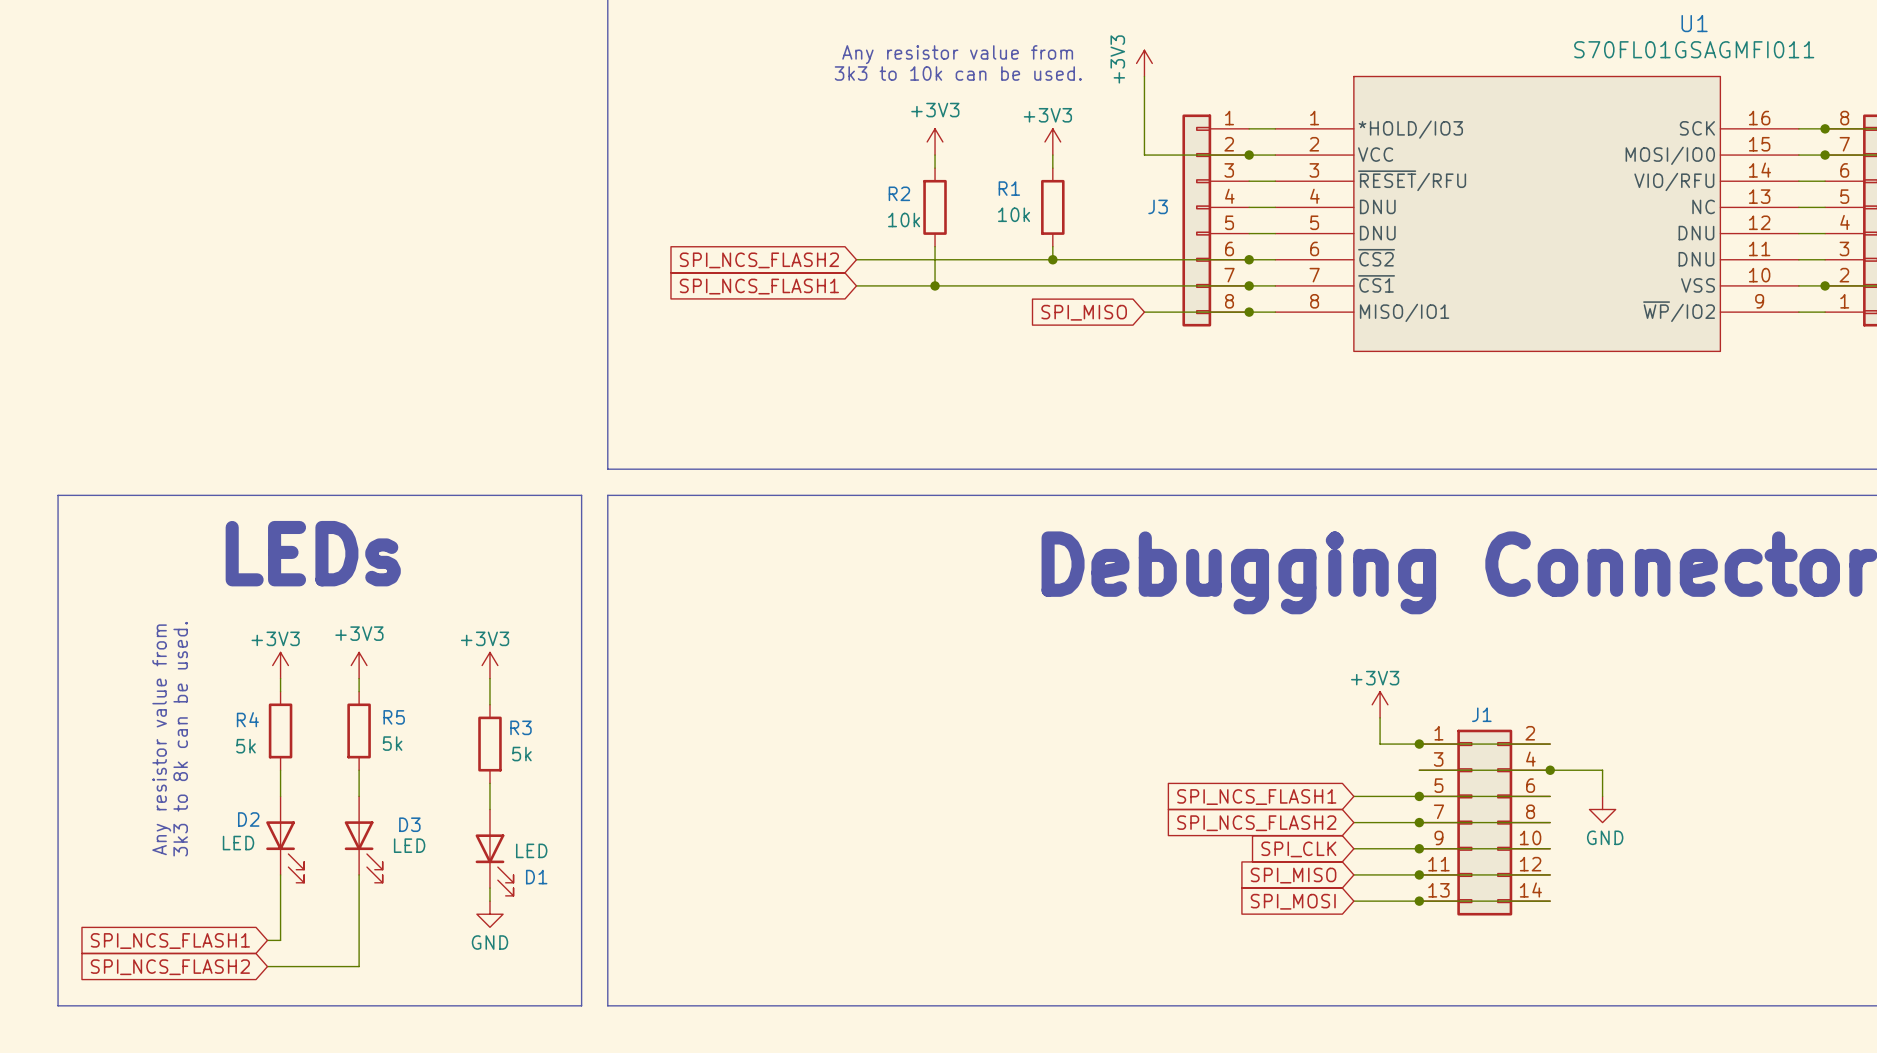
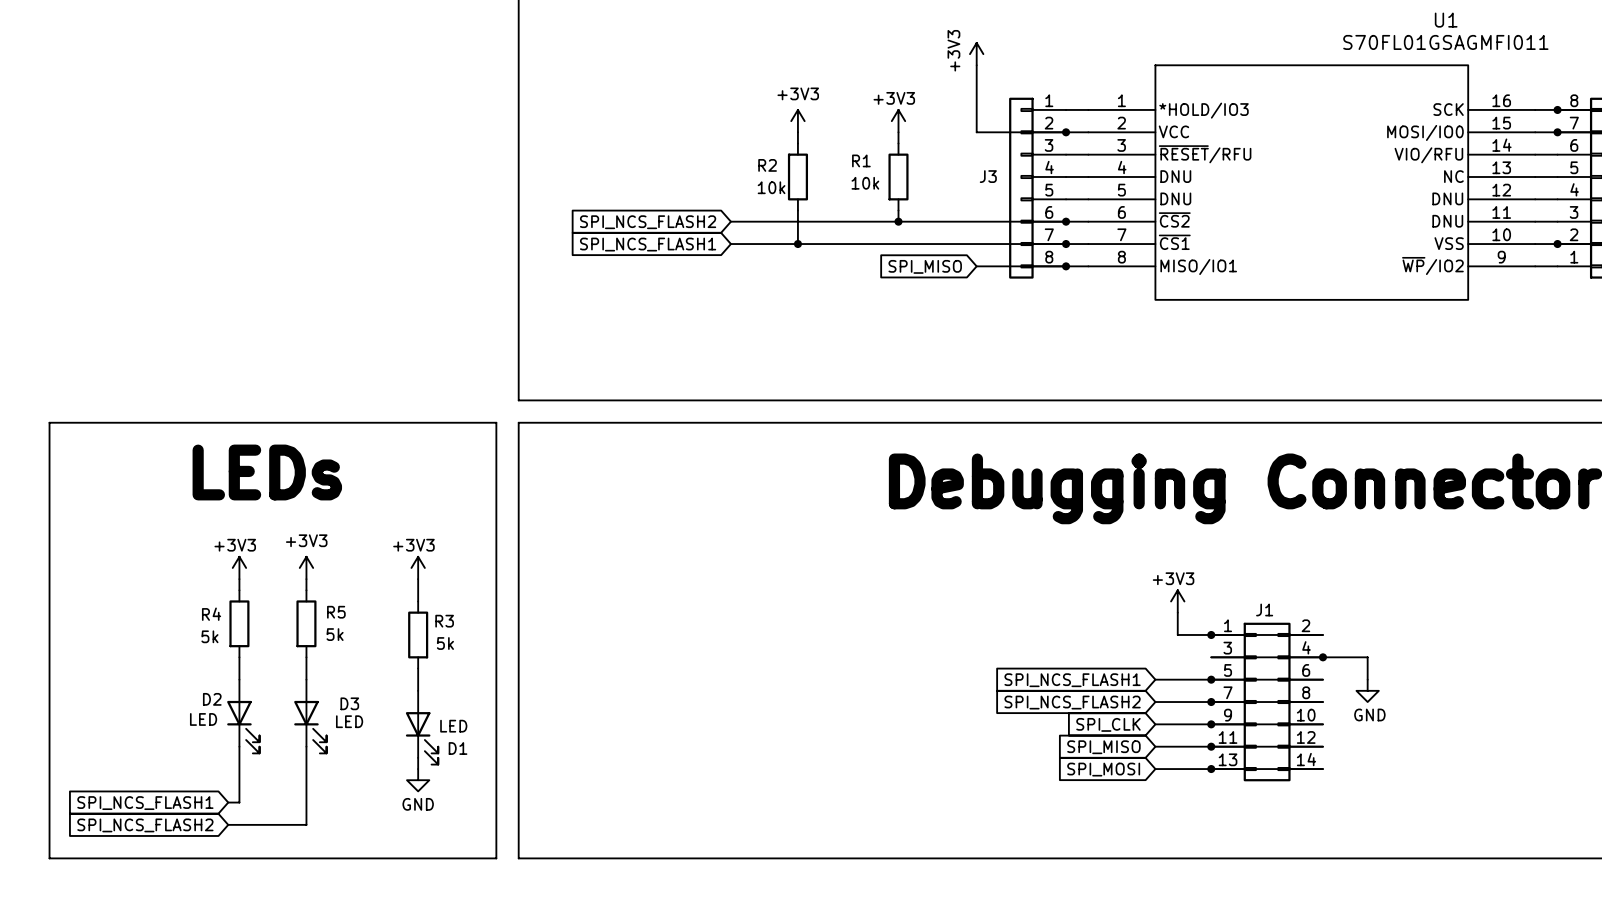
text: Any resistor value from (957, 54) -> none
text: 3k3 to 10k can be used. (958, 73) -> none
text: Any resistor value from (161, 739) -> none
text: 3k3 to 8k can be used. (180, 739) -> none

